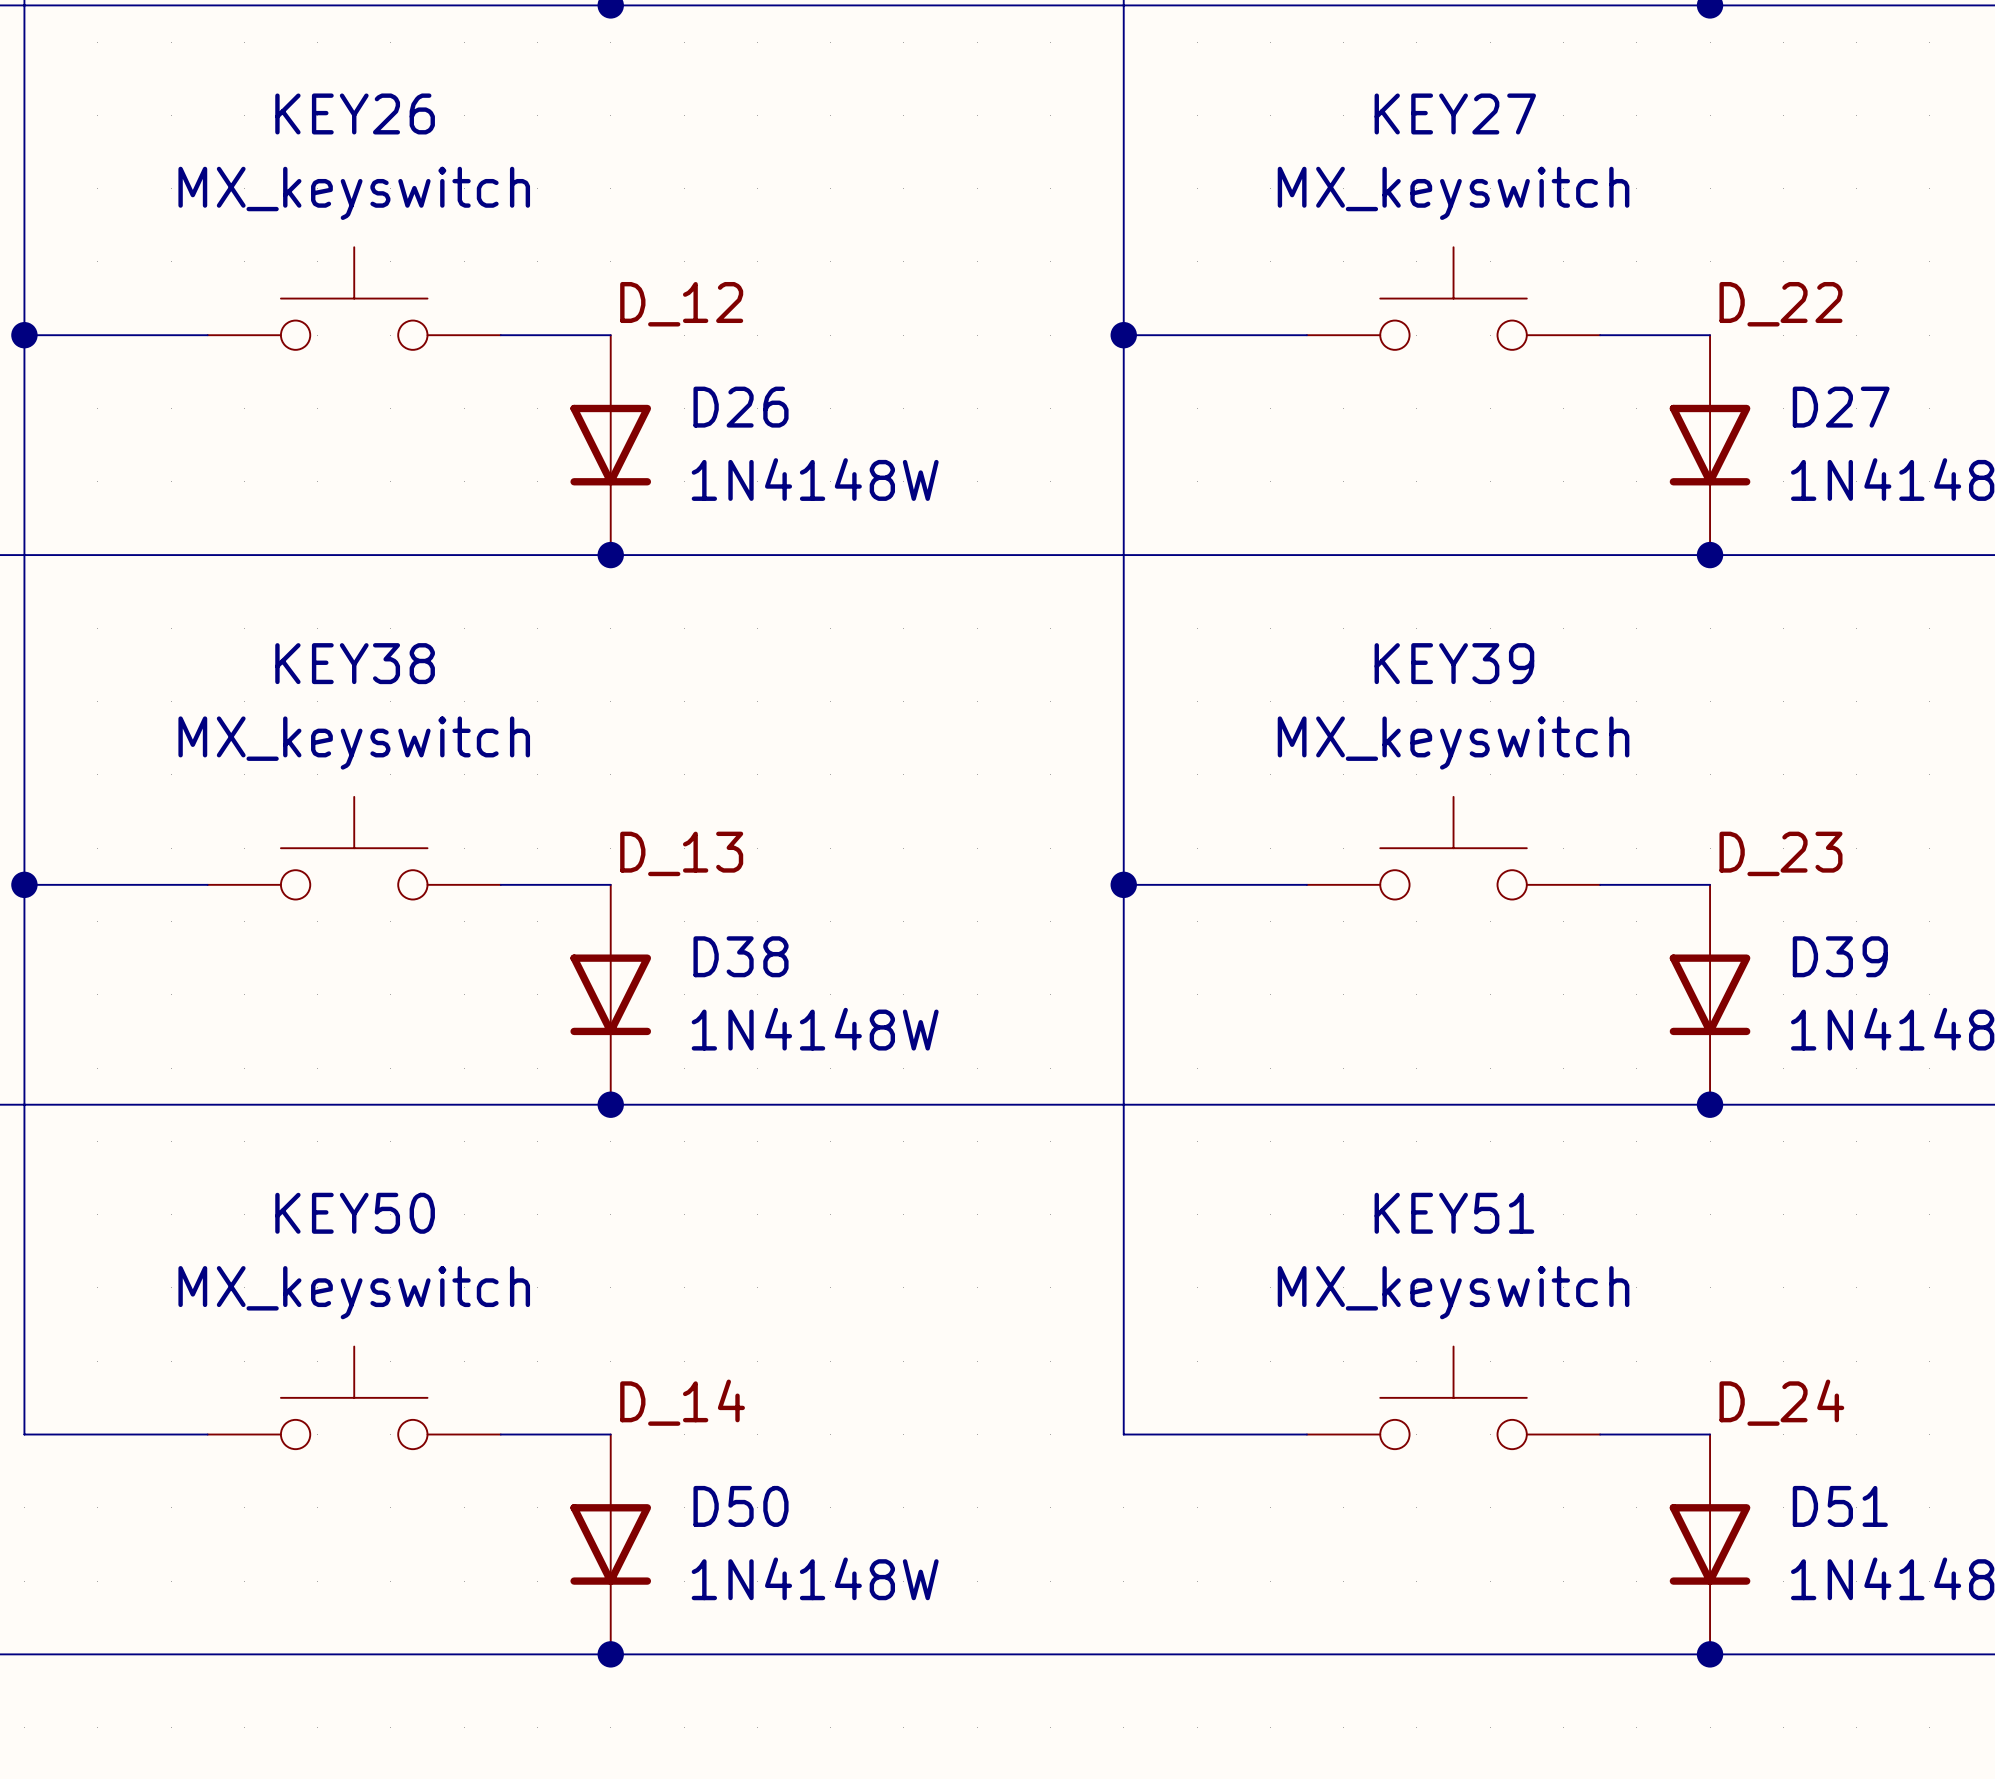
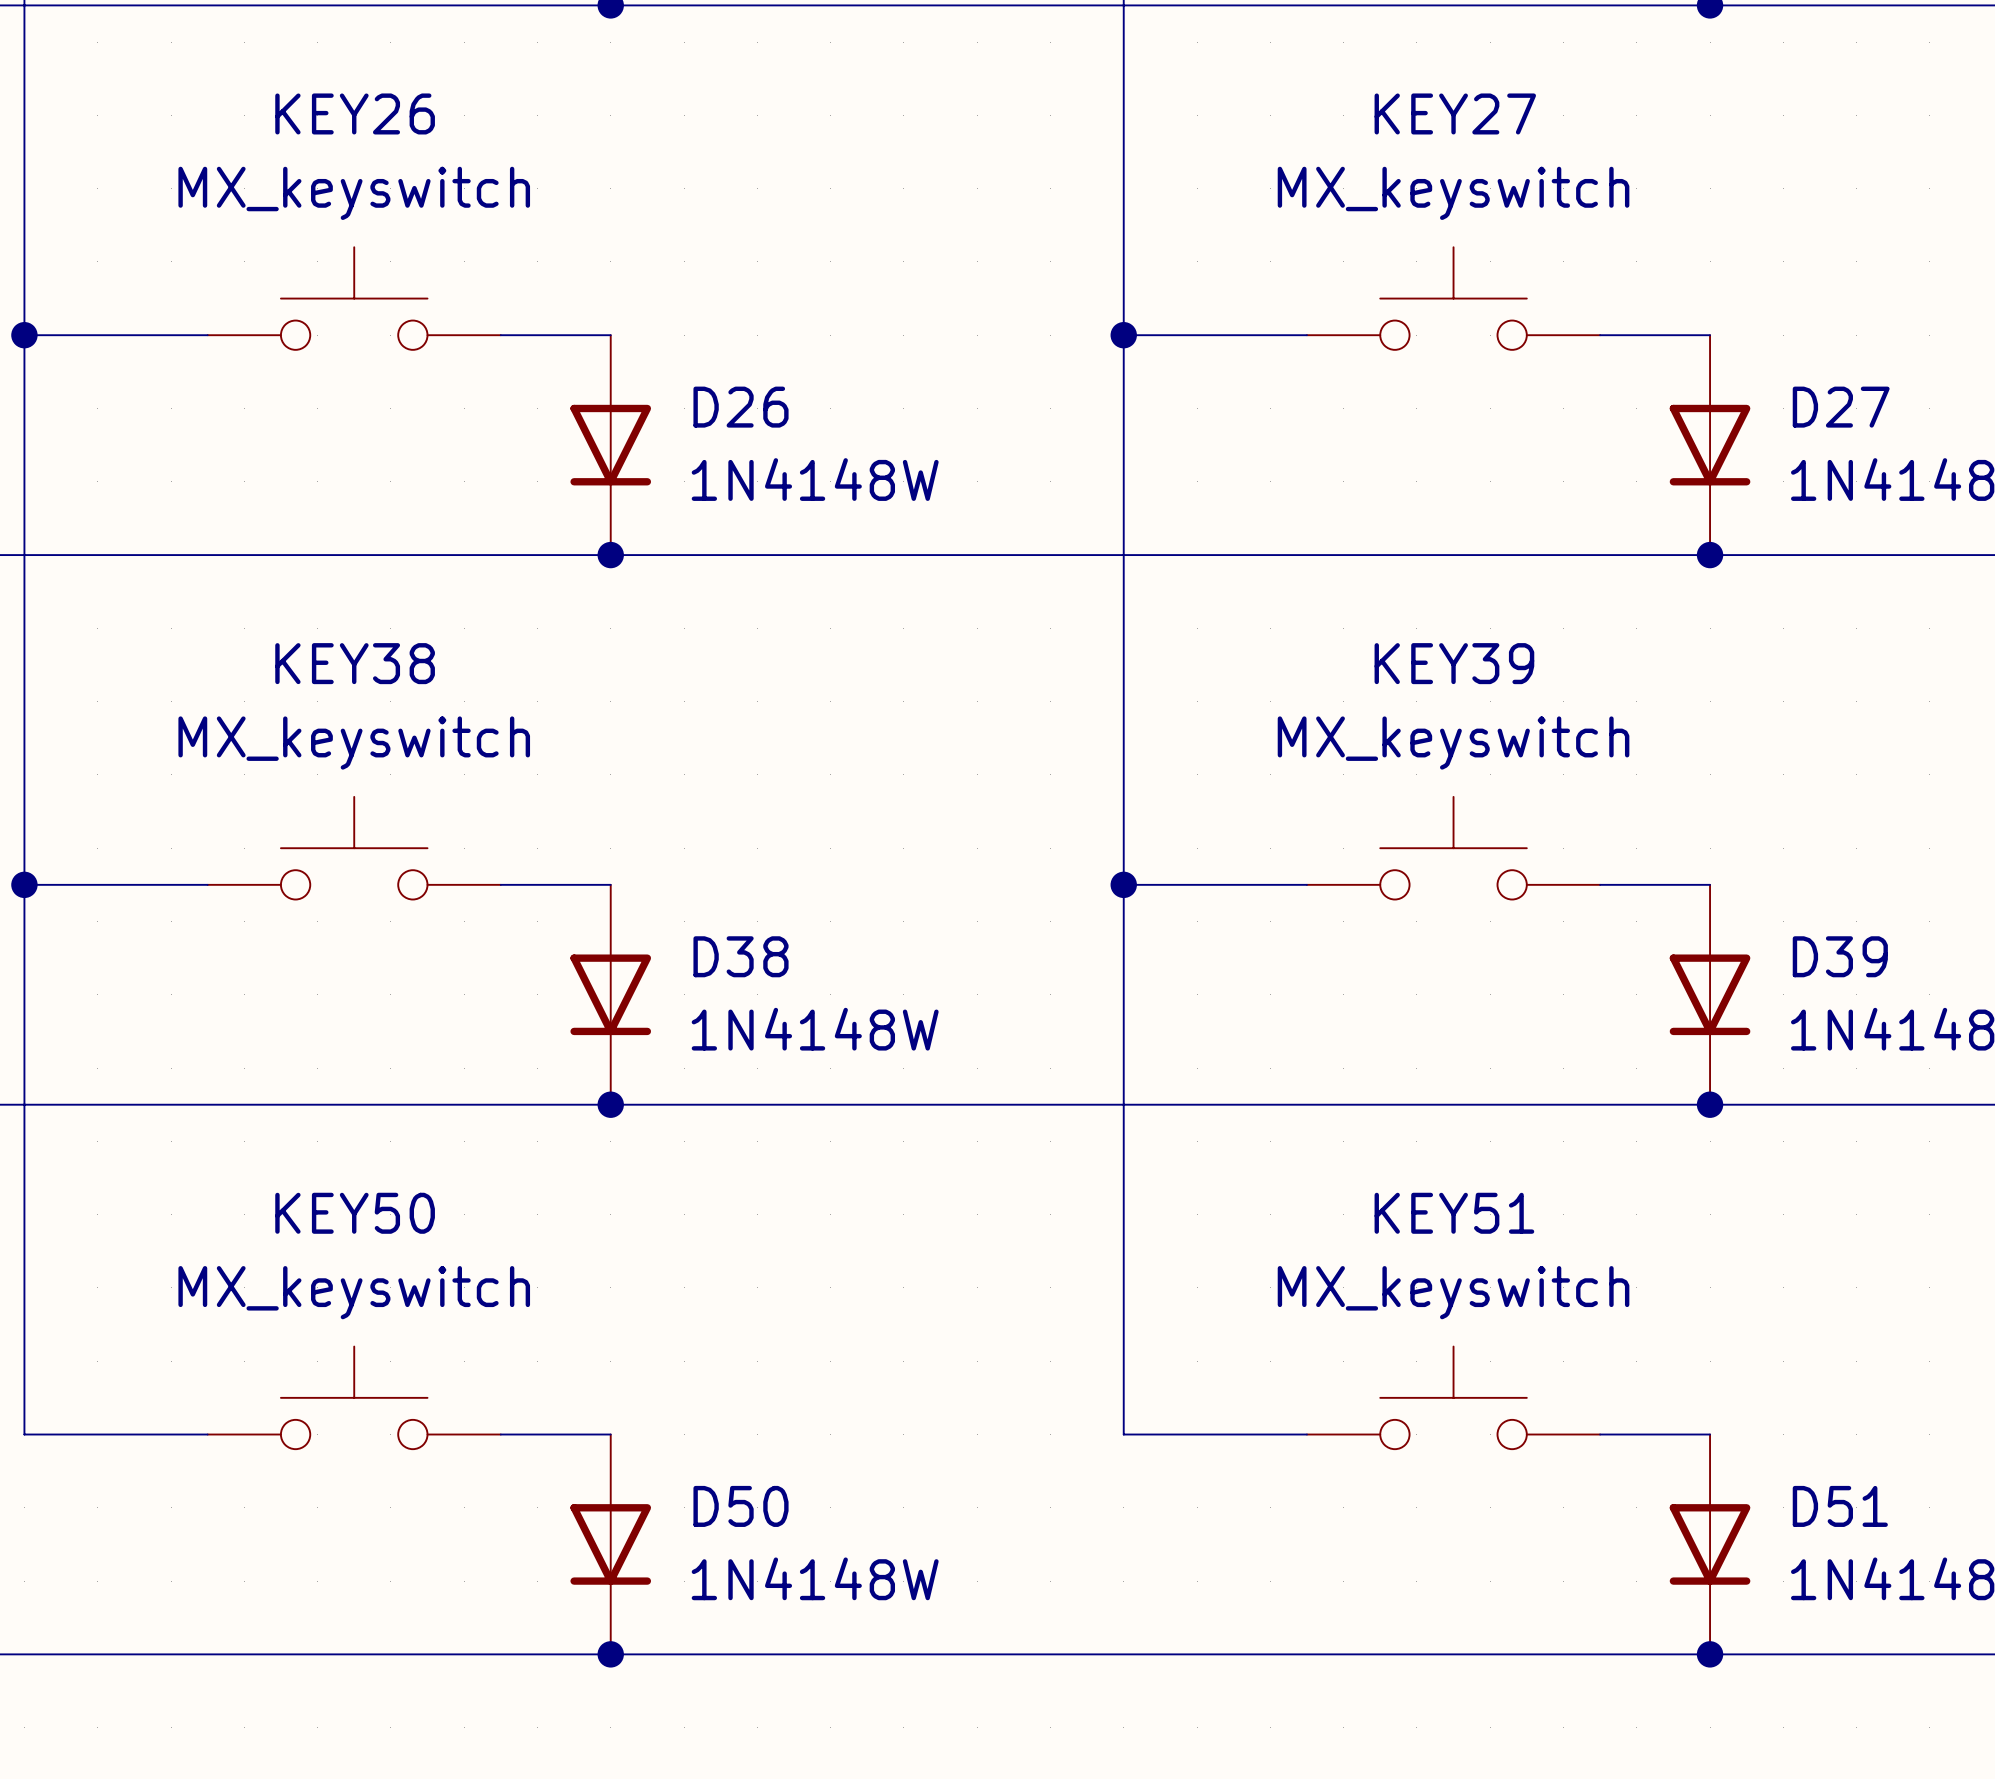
label: D_12 (681, 304) -> none
label: D_22 (1780, 304) -> none
label: D_13 (681, 853) -> none
label: D_23 (1780, 853) -> none
label: D_14 (682, 1402) -> none
label: D_24 (1781, 1402) -> none

